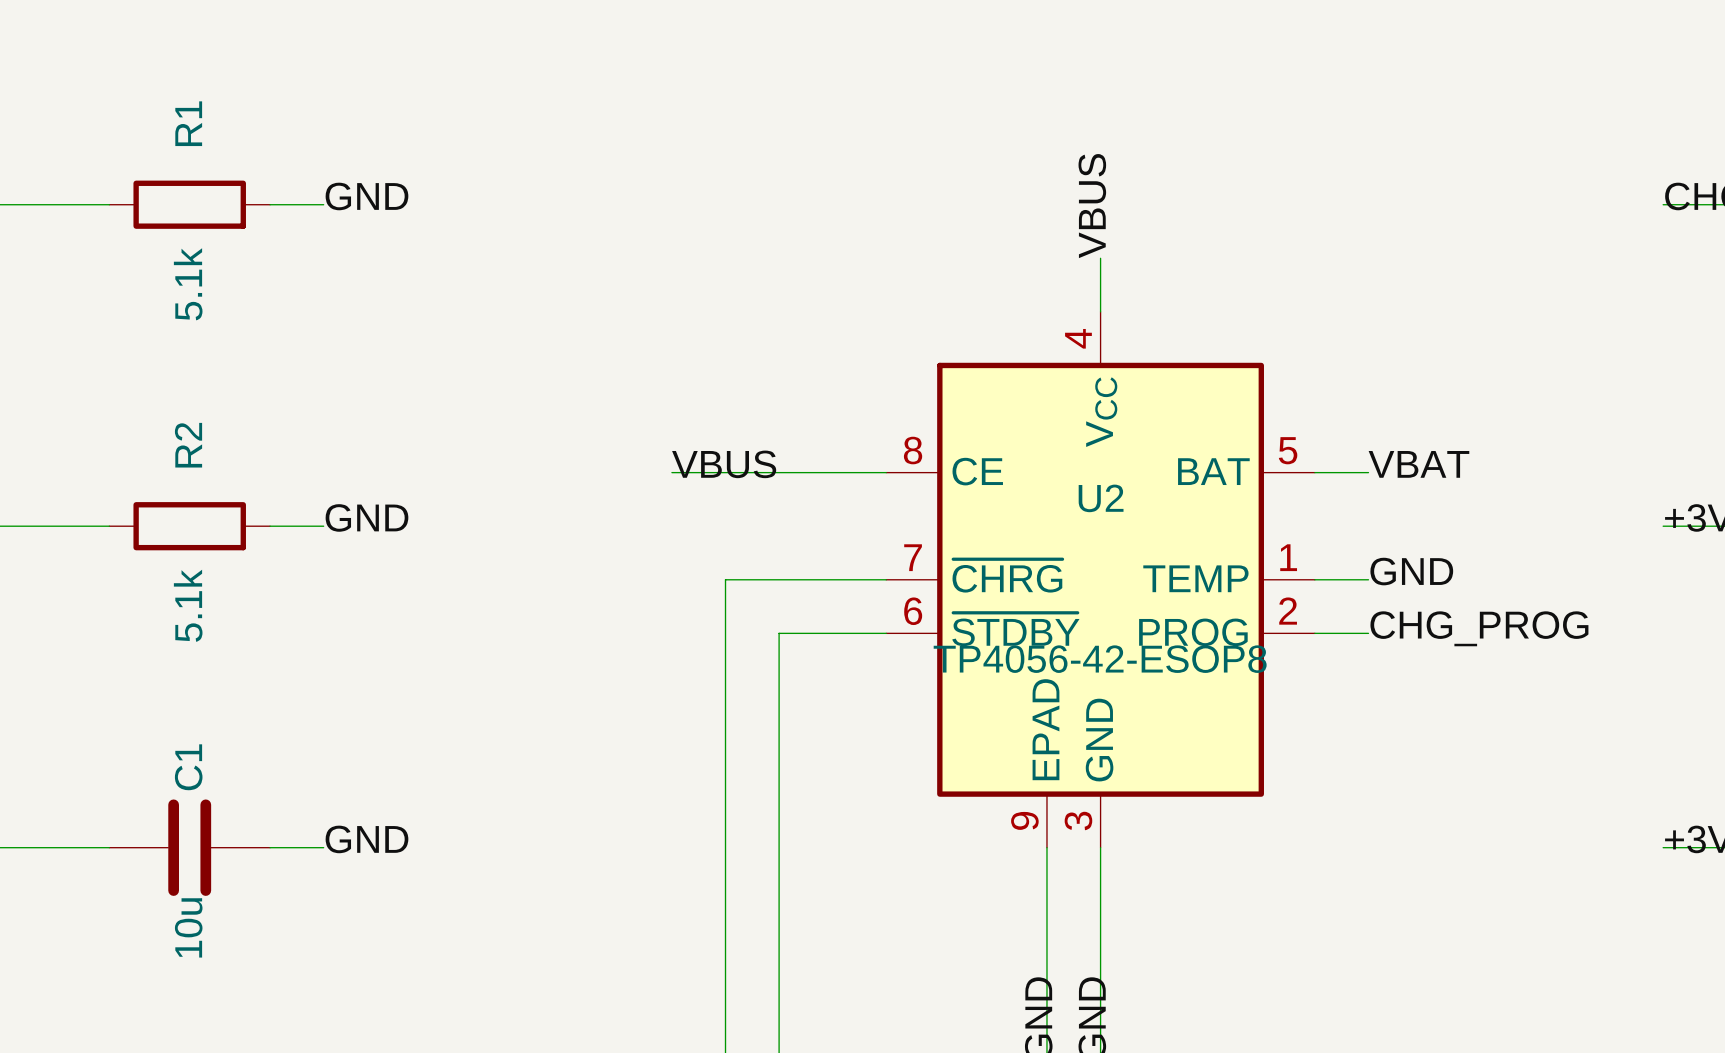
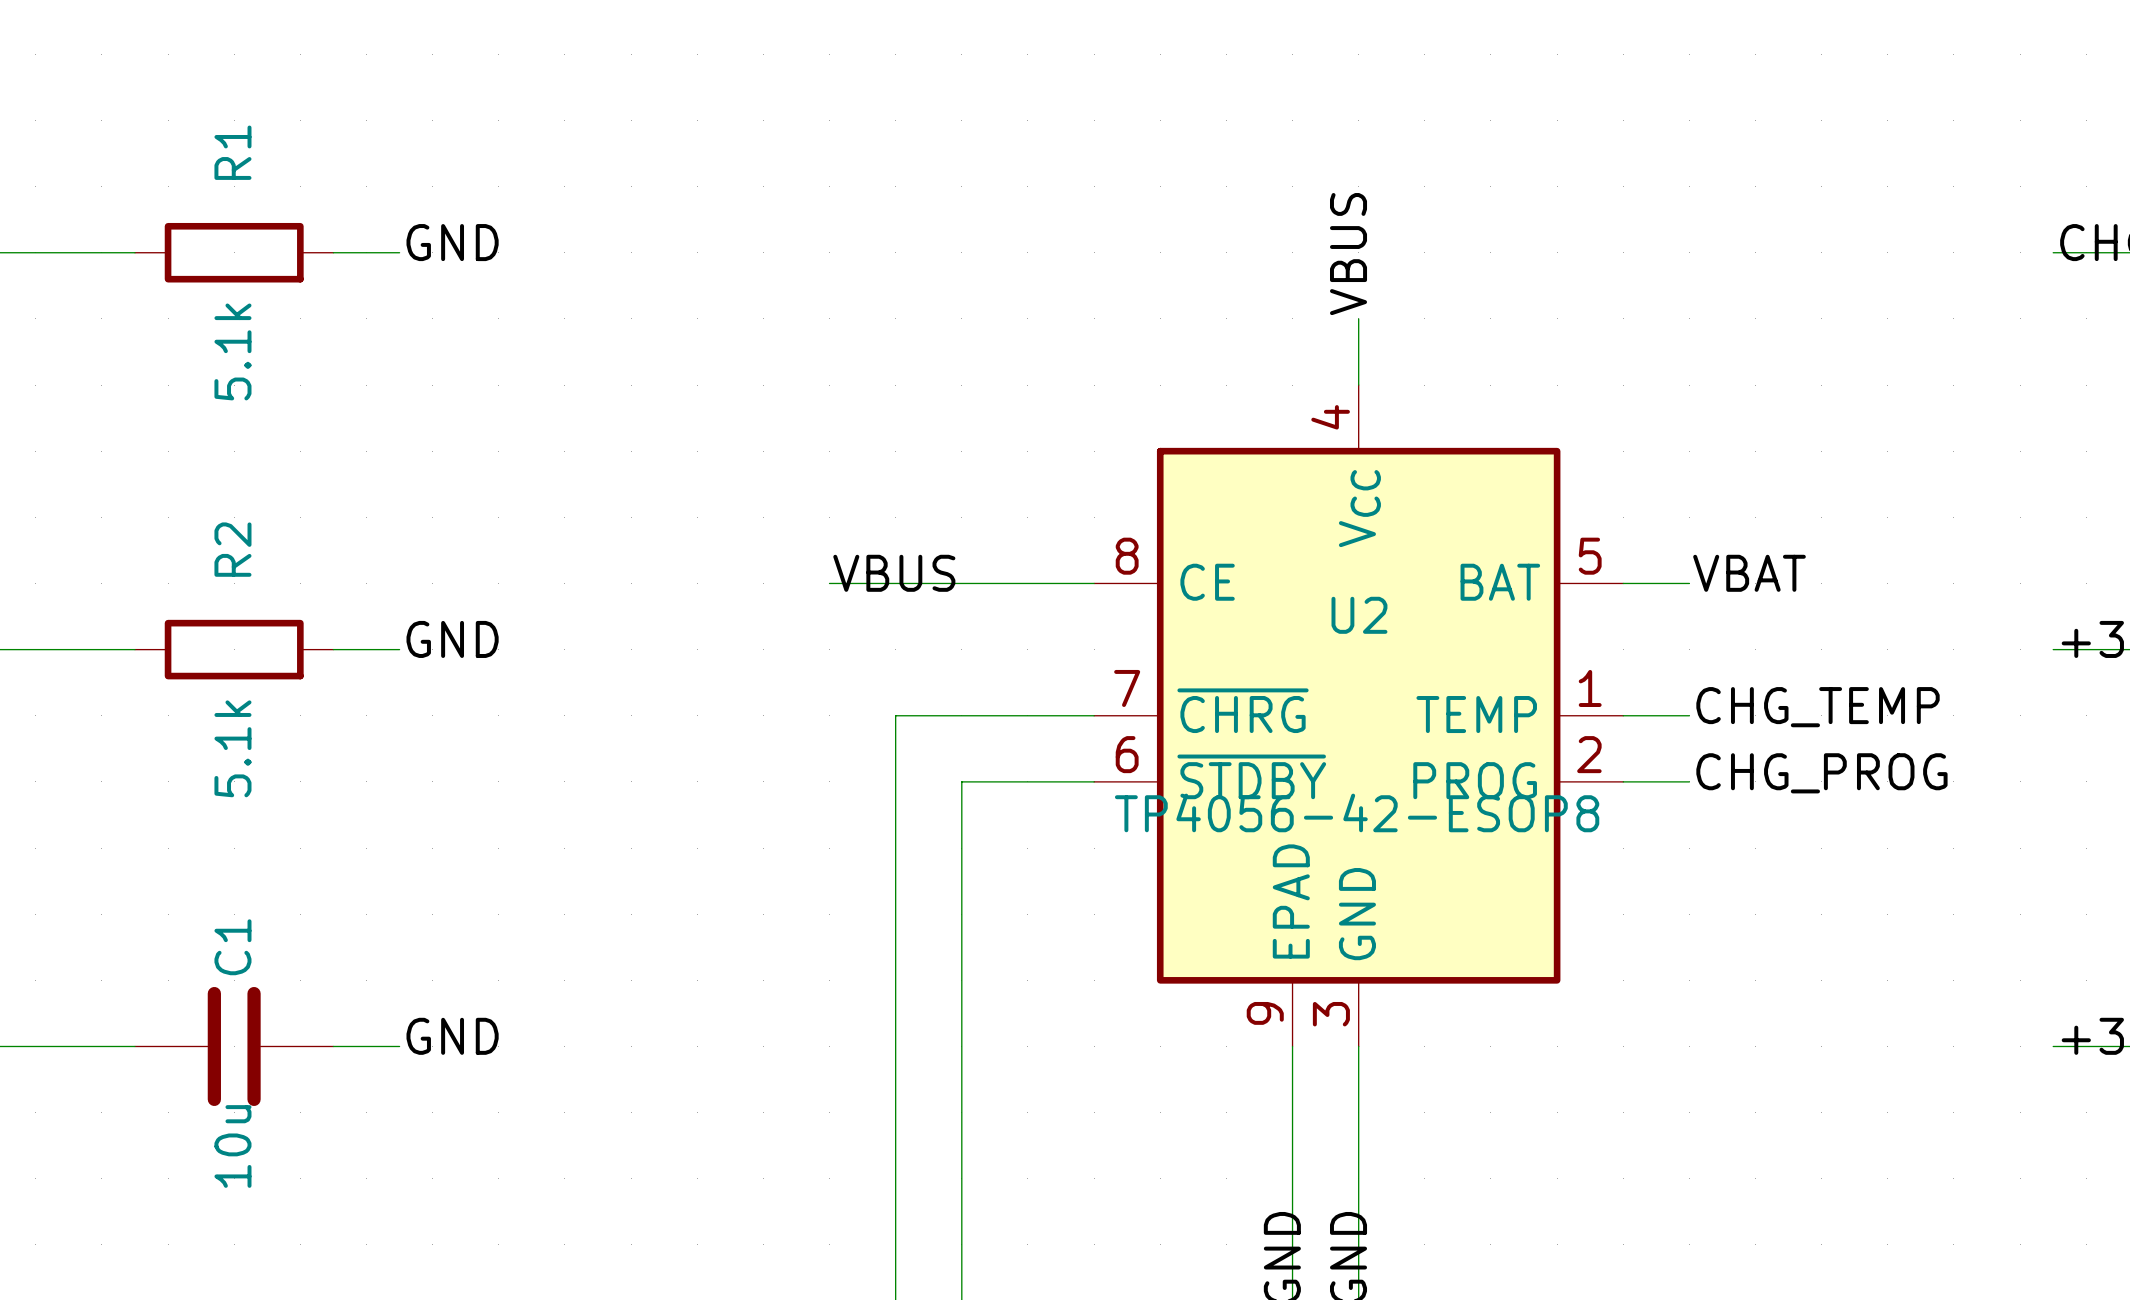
label: GND (1411, 571) -> CHG_TEMP (1818, 707)

